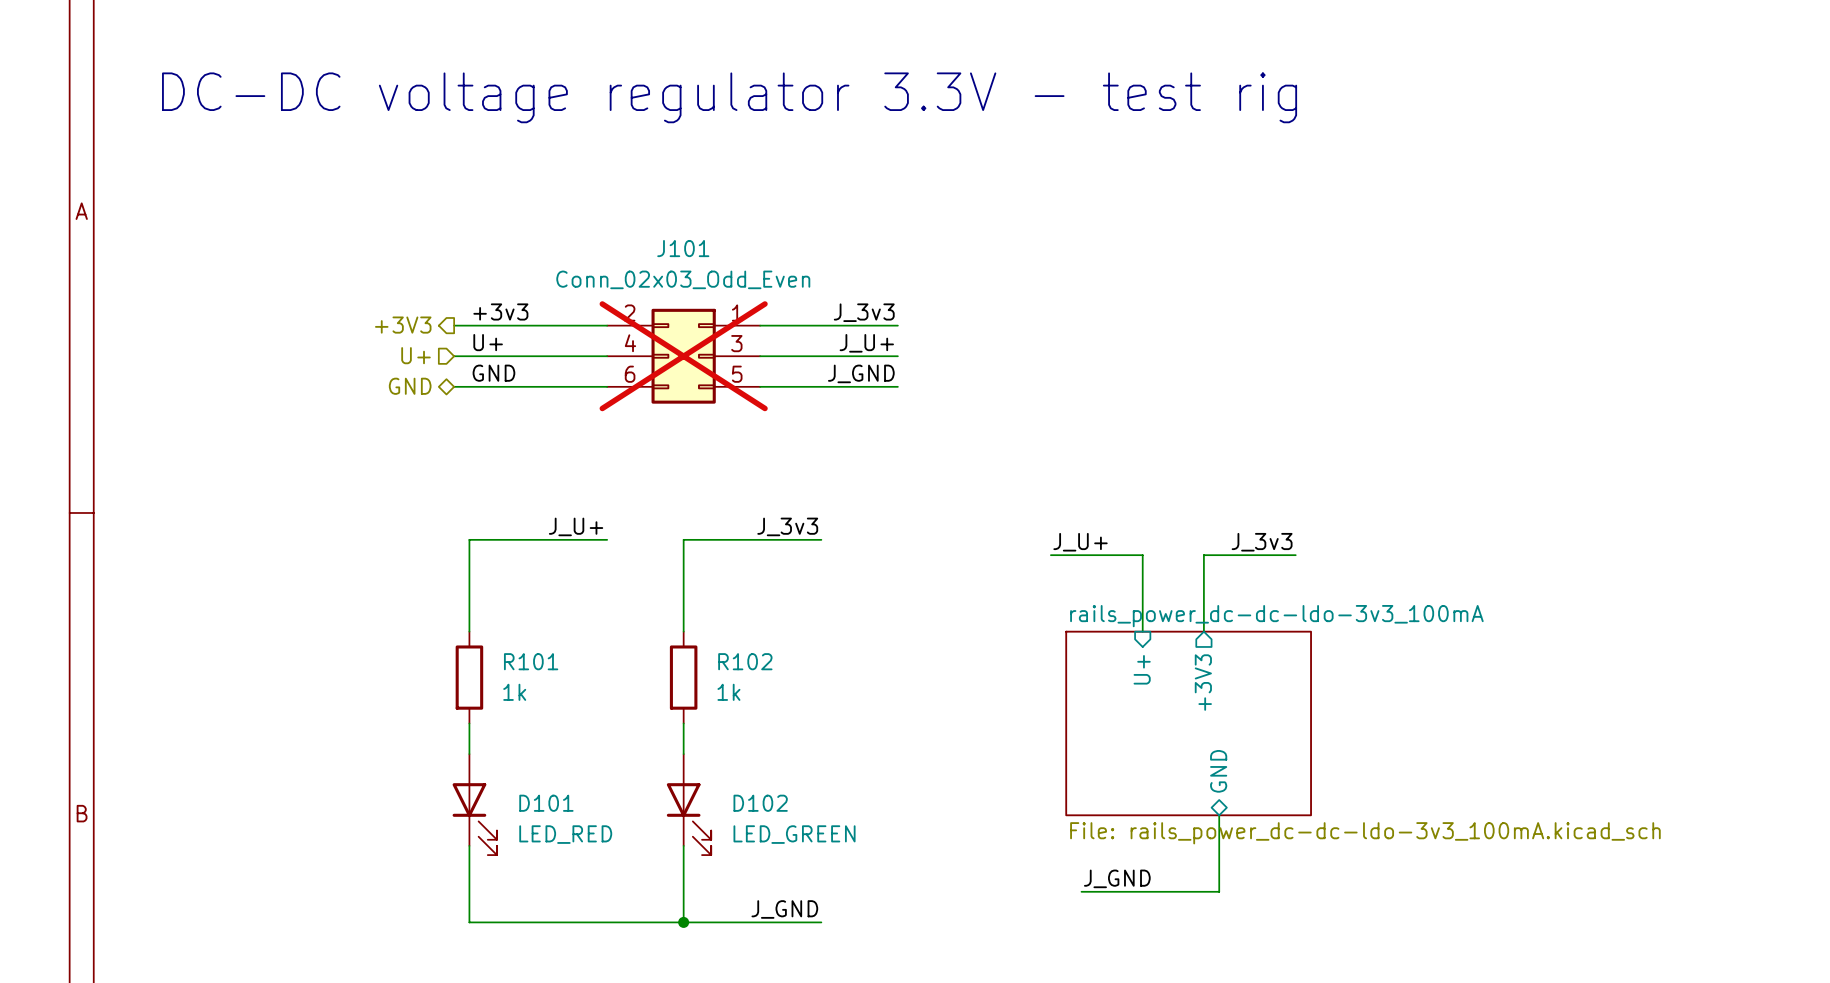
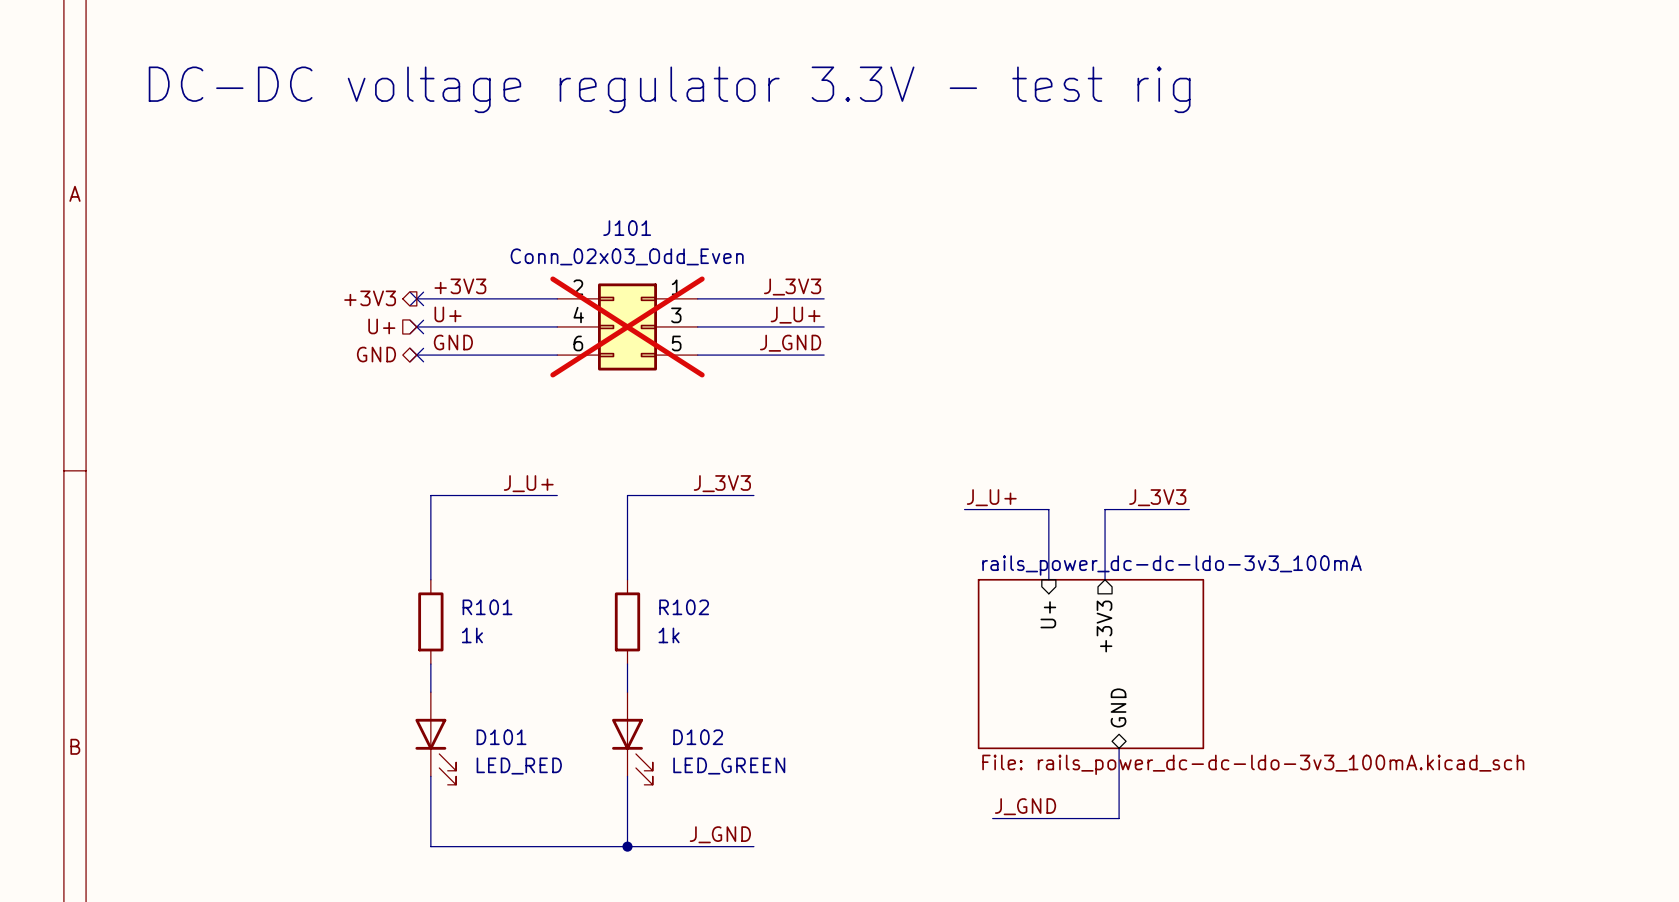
label: +3v3 (500, 311) -> +3V3 (460, 286)
label: J_3v3 (864, 312) -> J_3V3 (792, 287)
no-connect mark: none -> (416, 298)
no-connect mark: none -> (416, 326)
no-connect mark: none -> (416, 355)
label: J_3v3 (787, 526) -> J_3V3 (722, 483)
label: J_3v3 (1262, 542) -> J_3V3 (1157, 497)

